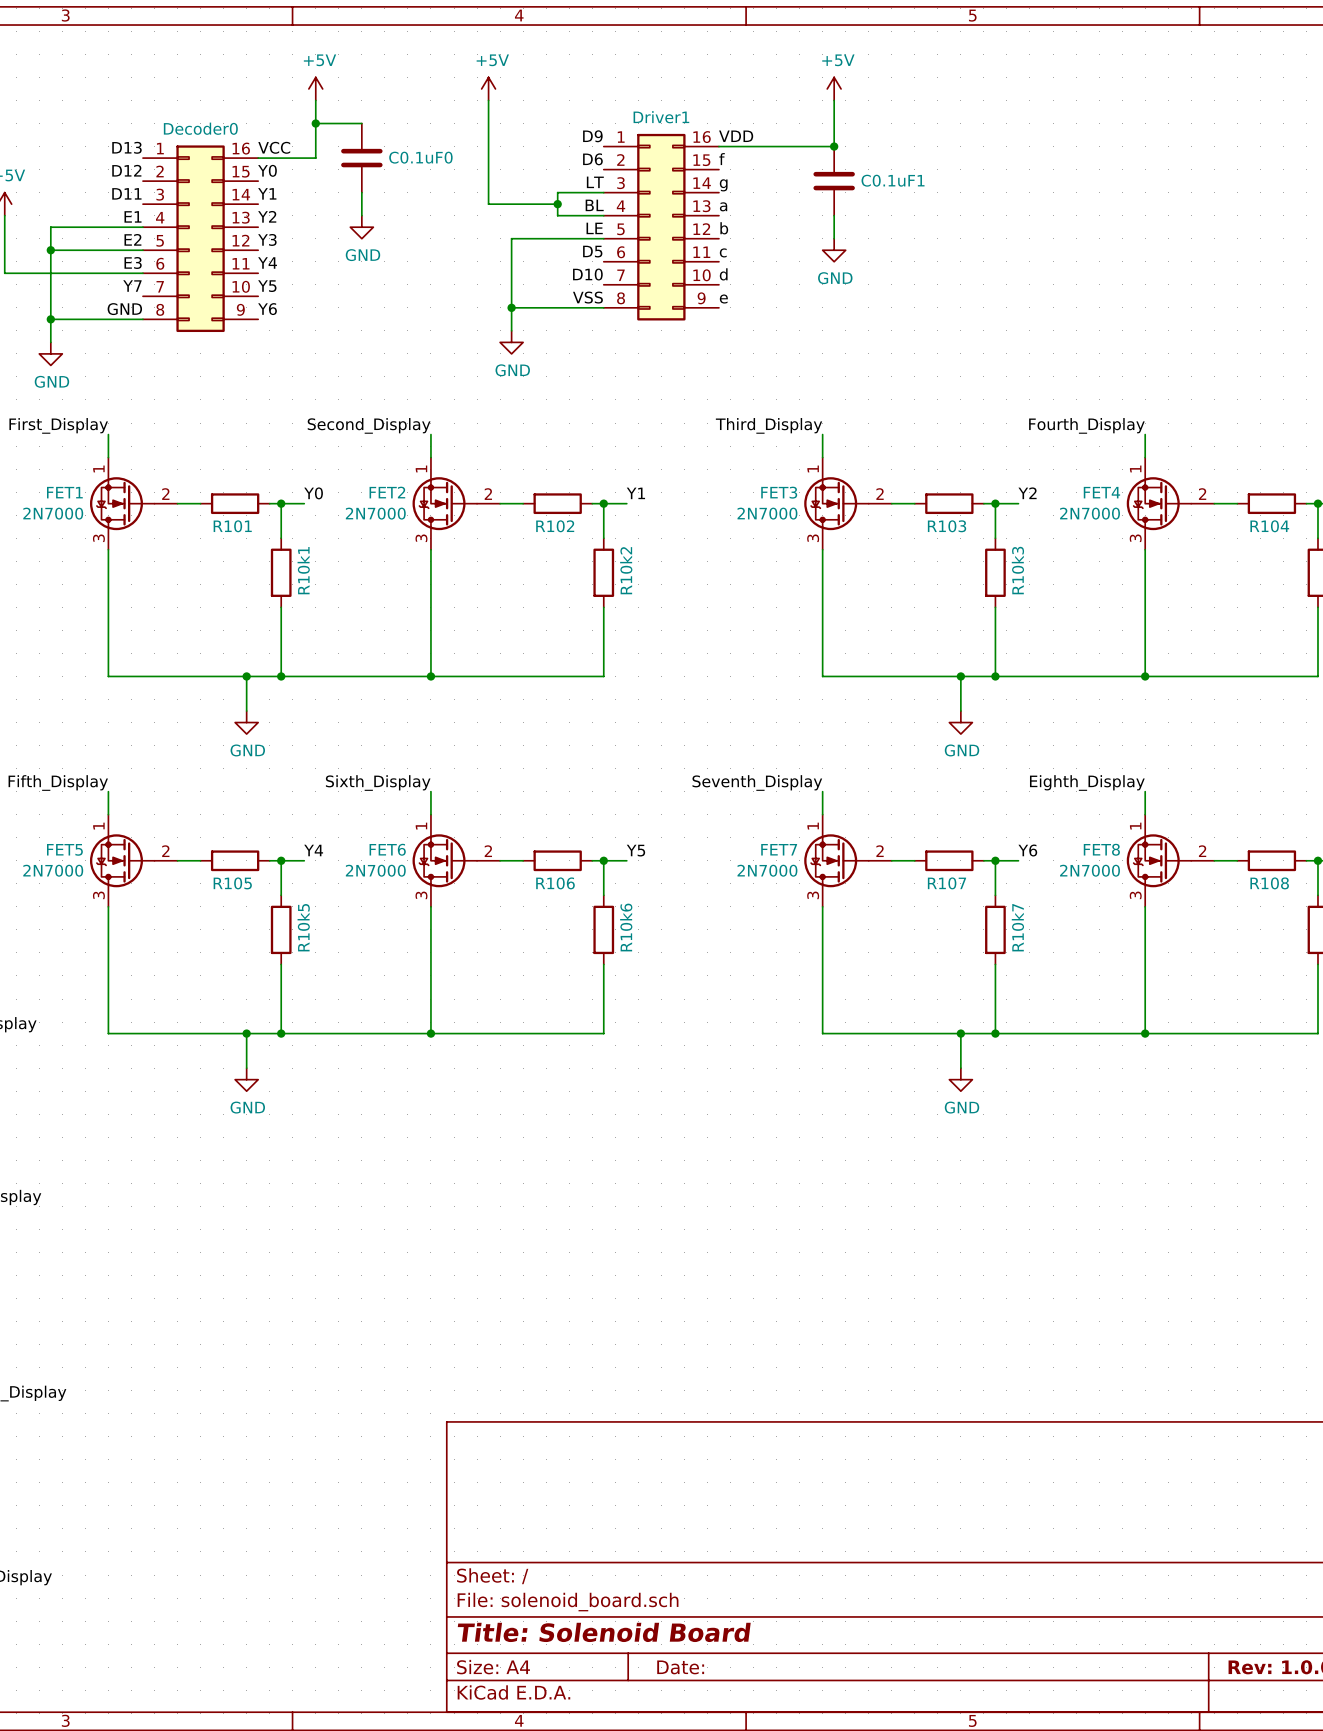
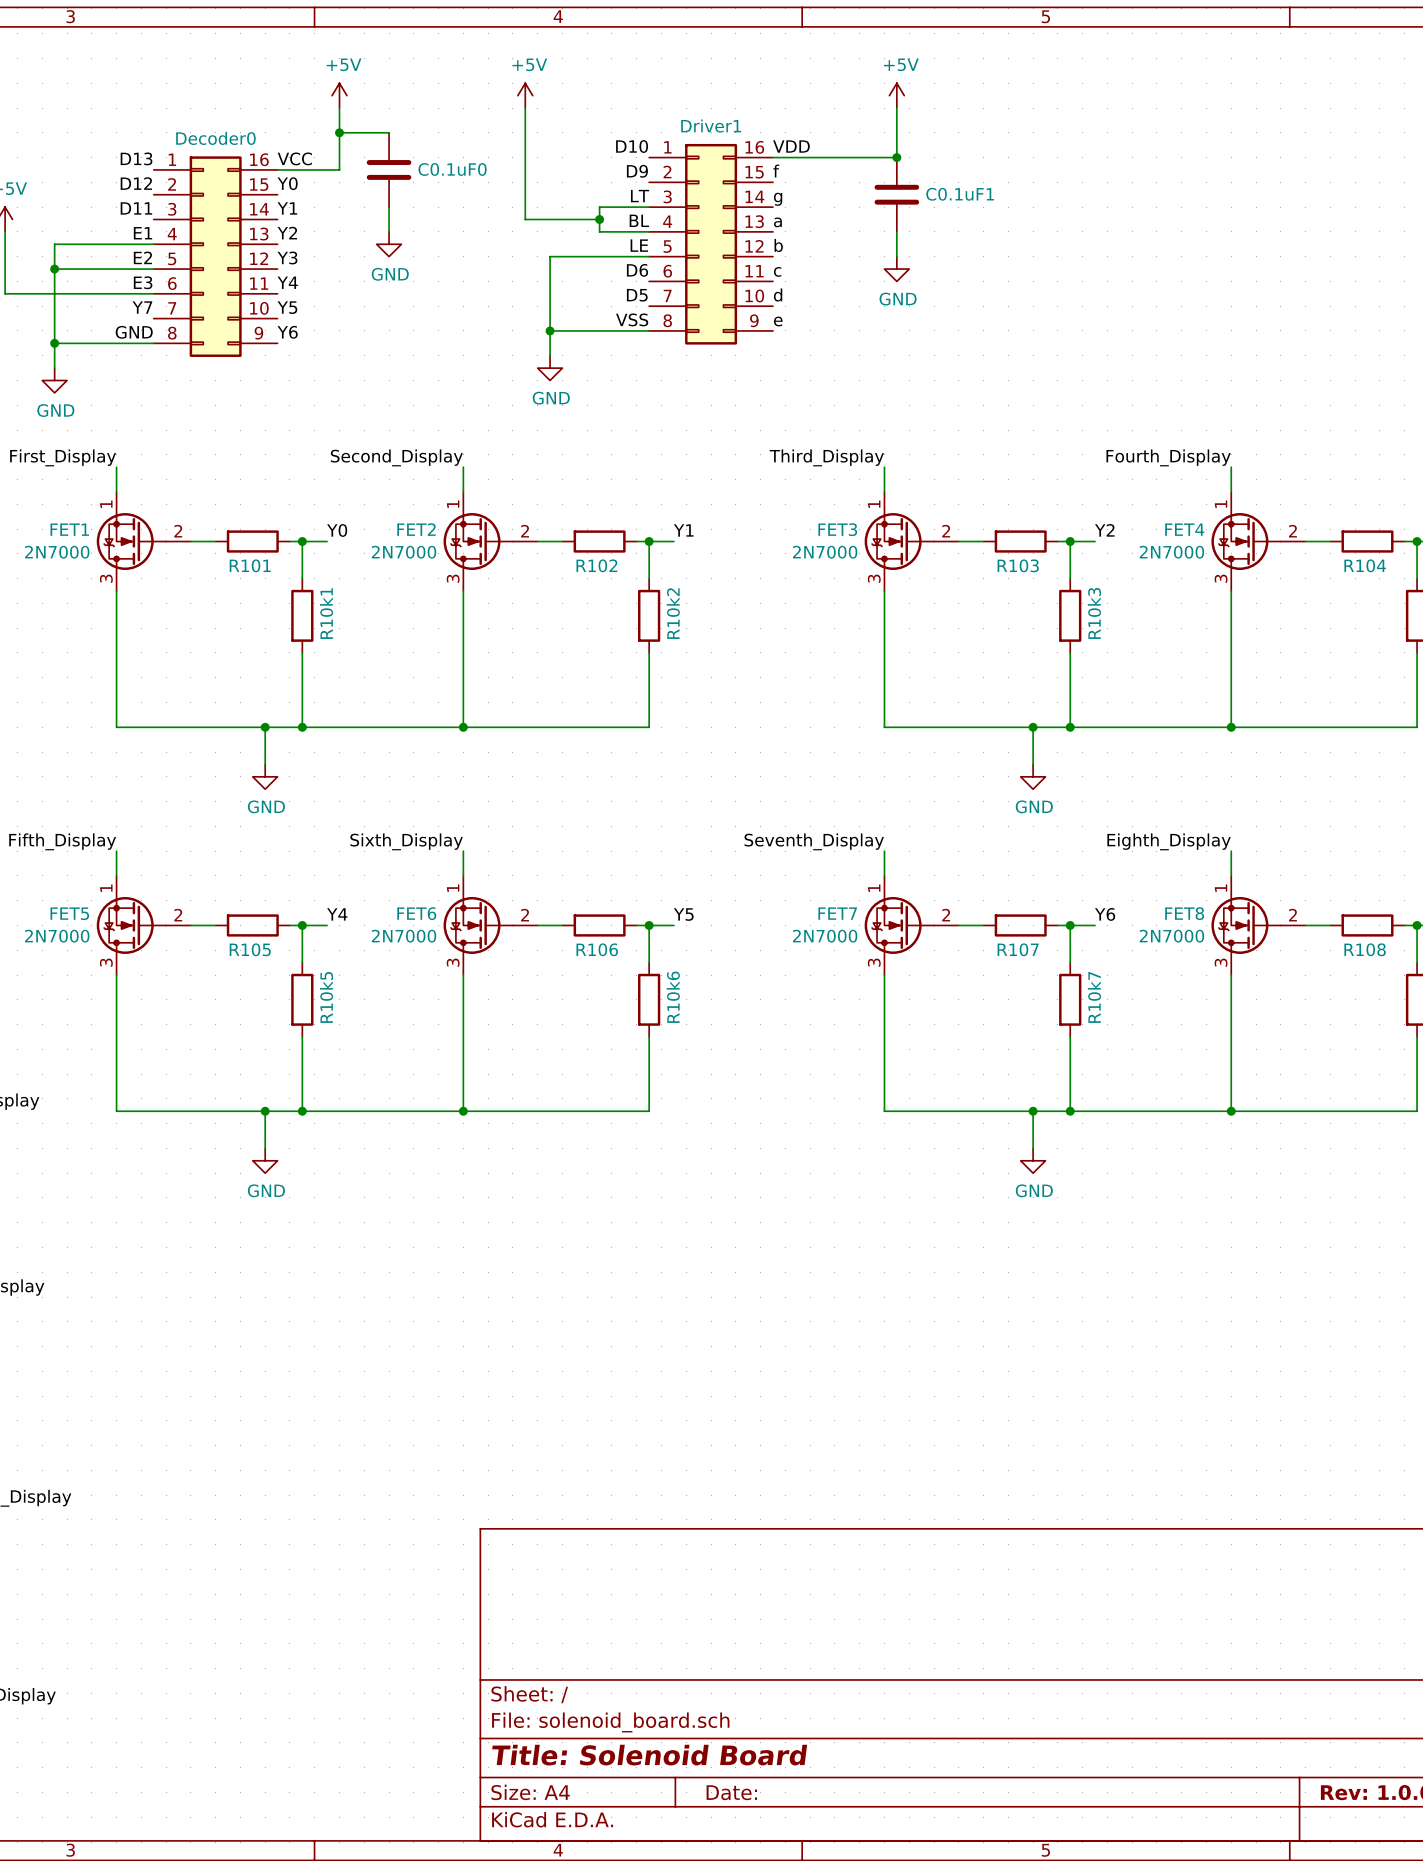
label: D9 (592, 136) -> D10 (632, 146)
label: D6 (592, 159) -> D9 (637, 171)
label: D5 (592, 251) -> D6 (637, 270)
label: D10 (587, 274) -> D5 (637, 295)

